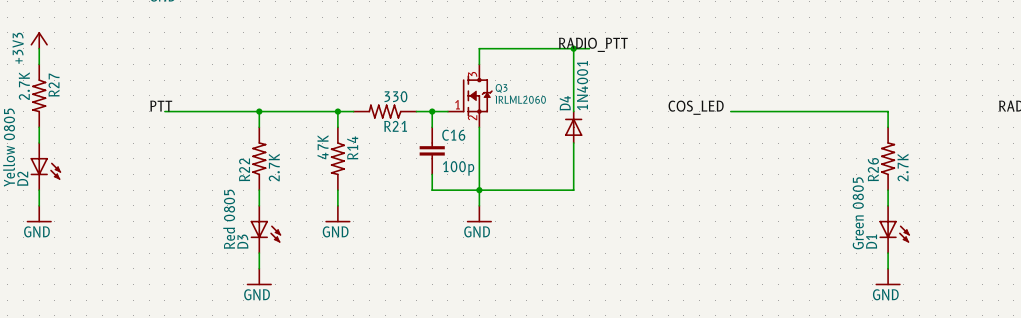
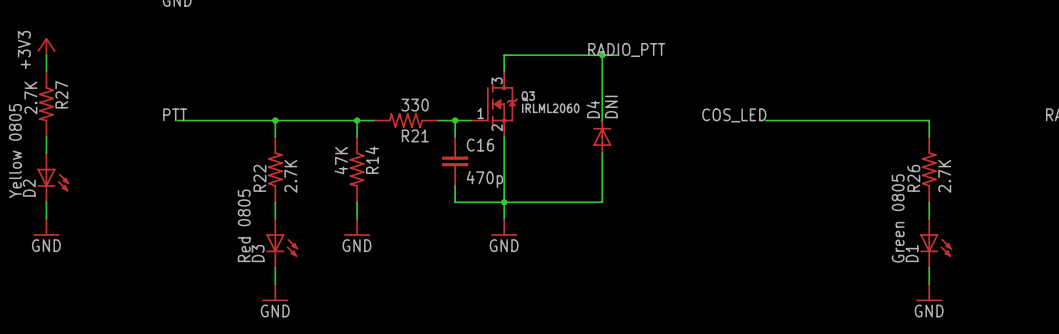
D4 value: 1N4001 (582, 85) -> DNI (611, 106)
C16 value: 100p (458, 168) -> 470p (484, 179)

